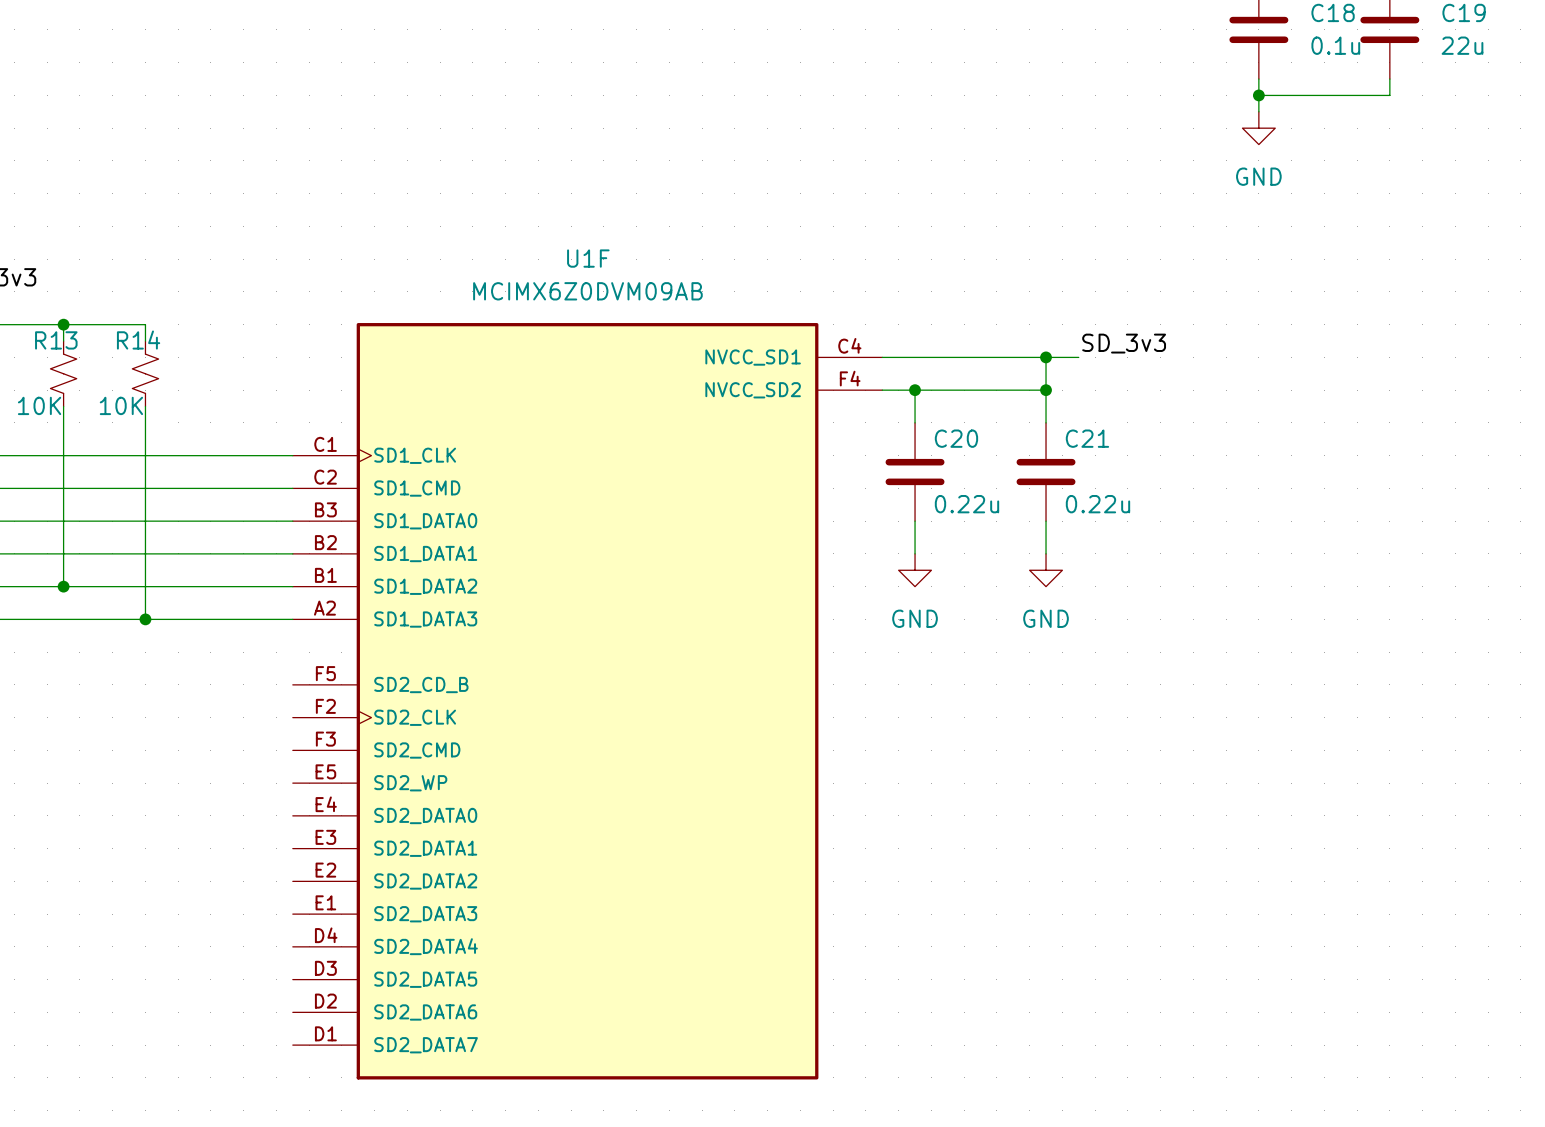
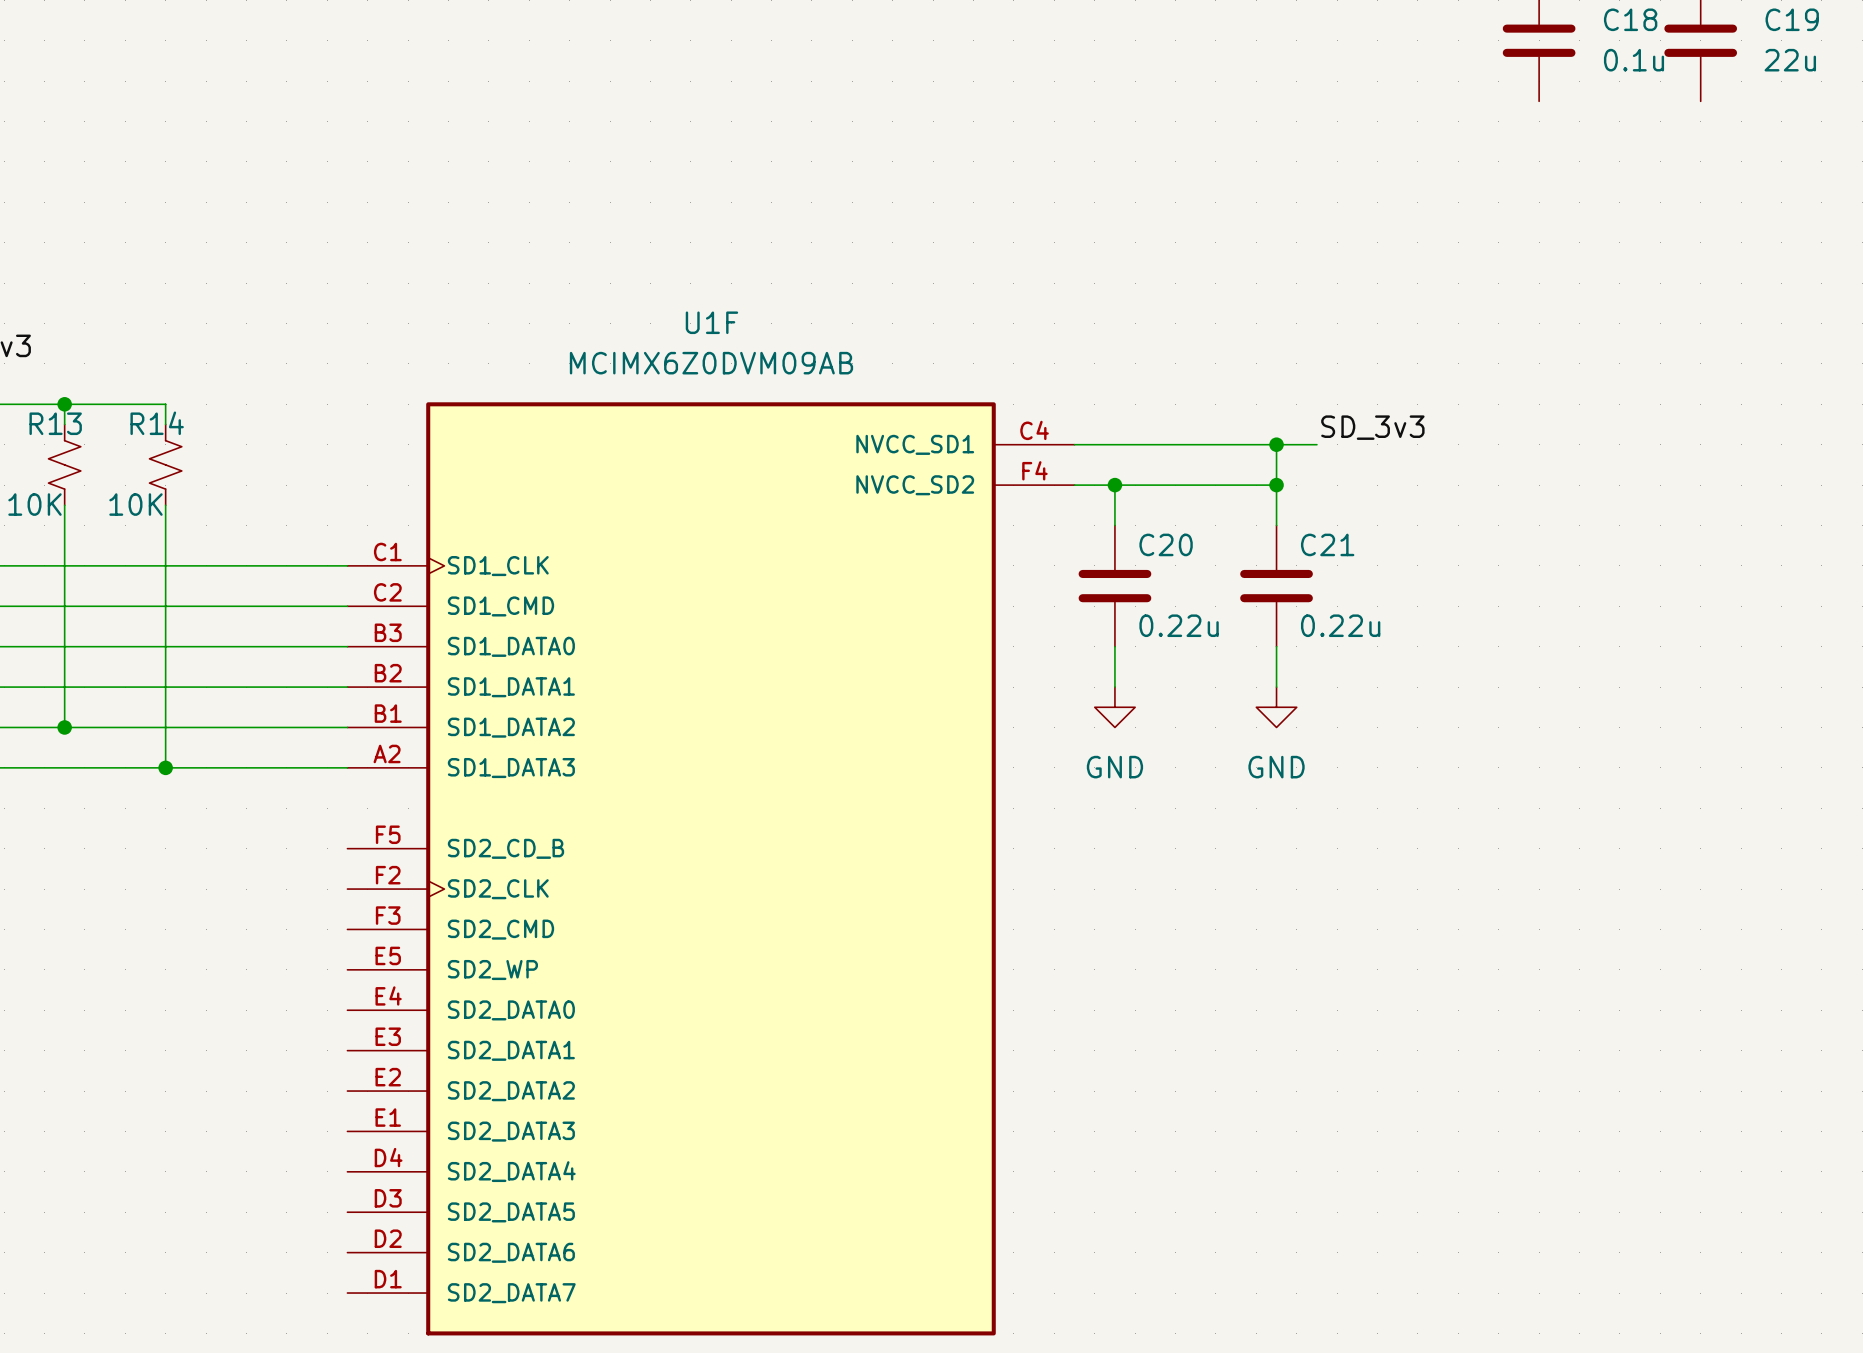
wire: (1258, 79) (1258, 111) -> none
wire: (1389, 79) (1389, 95) (1258, 95) -> none
junction: (1258, 95) -> none
power symbol: GND (1258, 128) -> none

